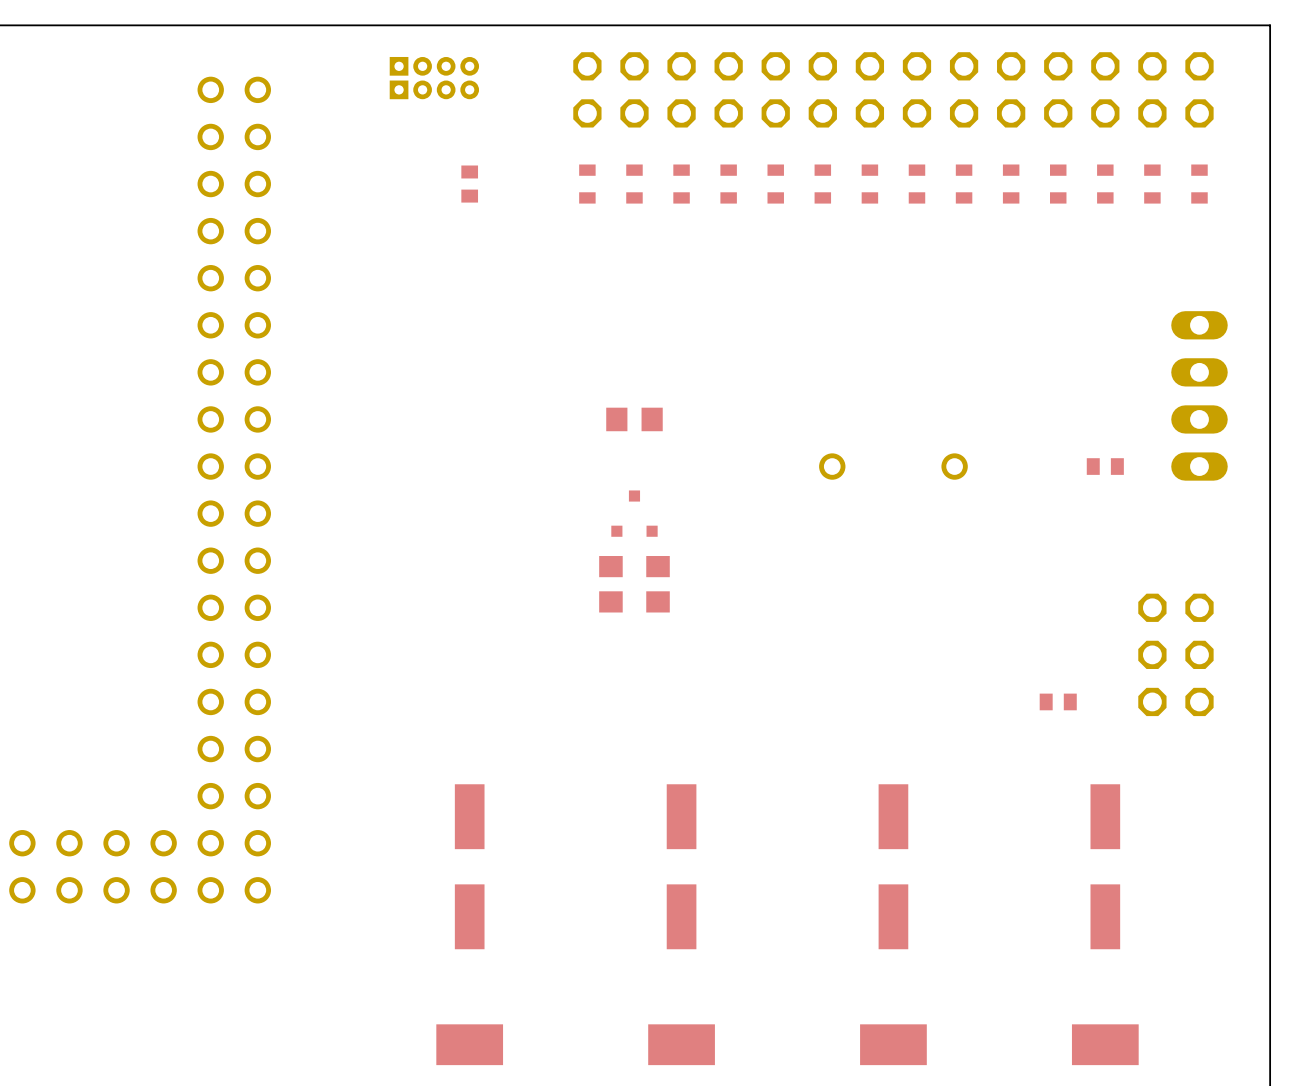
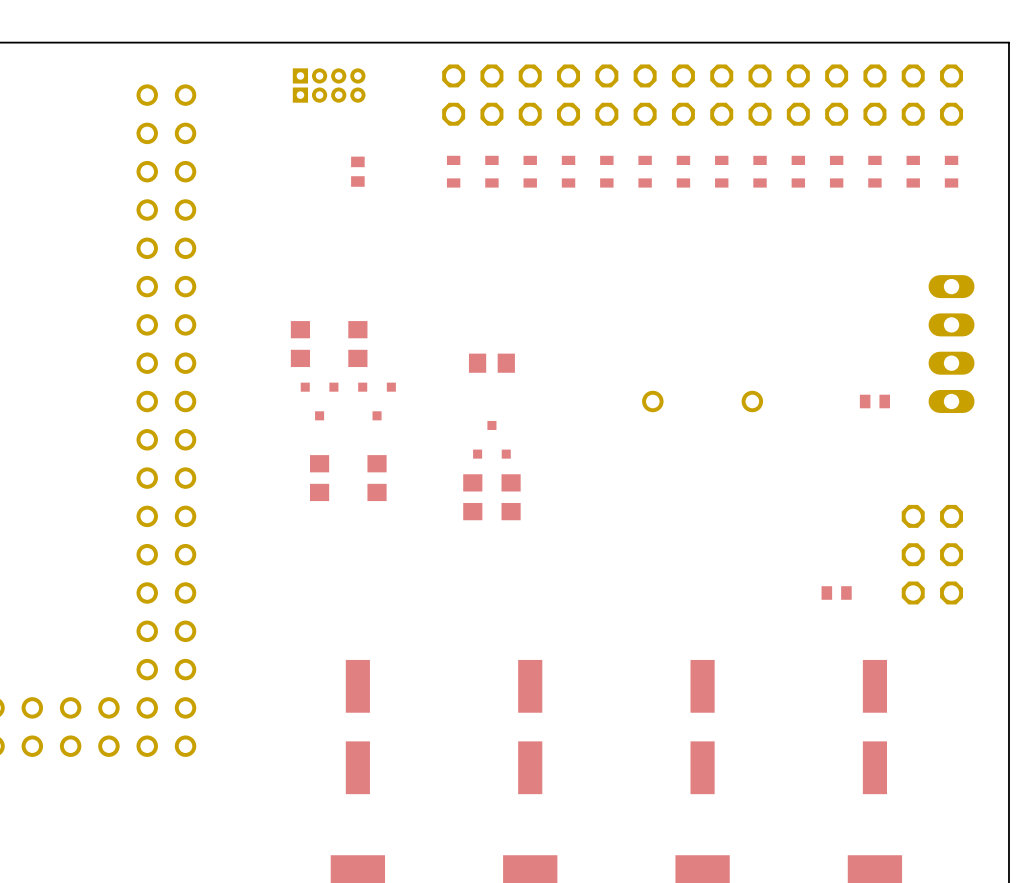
part: none -> (300, 344)
part: none -> (357, 344)
part: none -> (319, 401)
part: none -> (377, 401)
part: none -> (319, 478)
part: none -> (377, 478)

